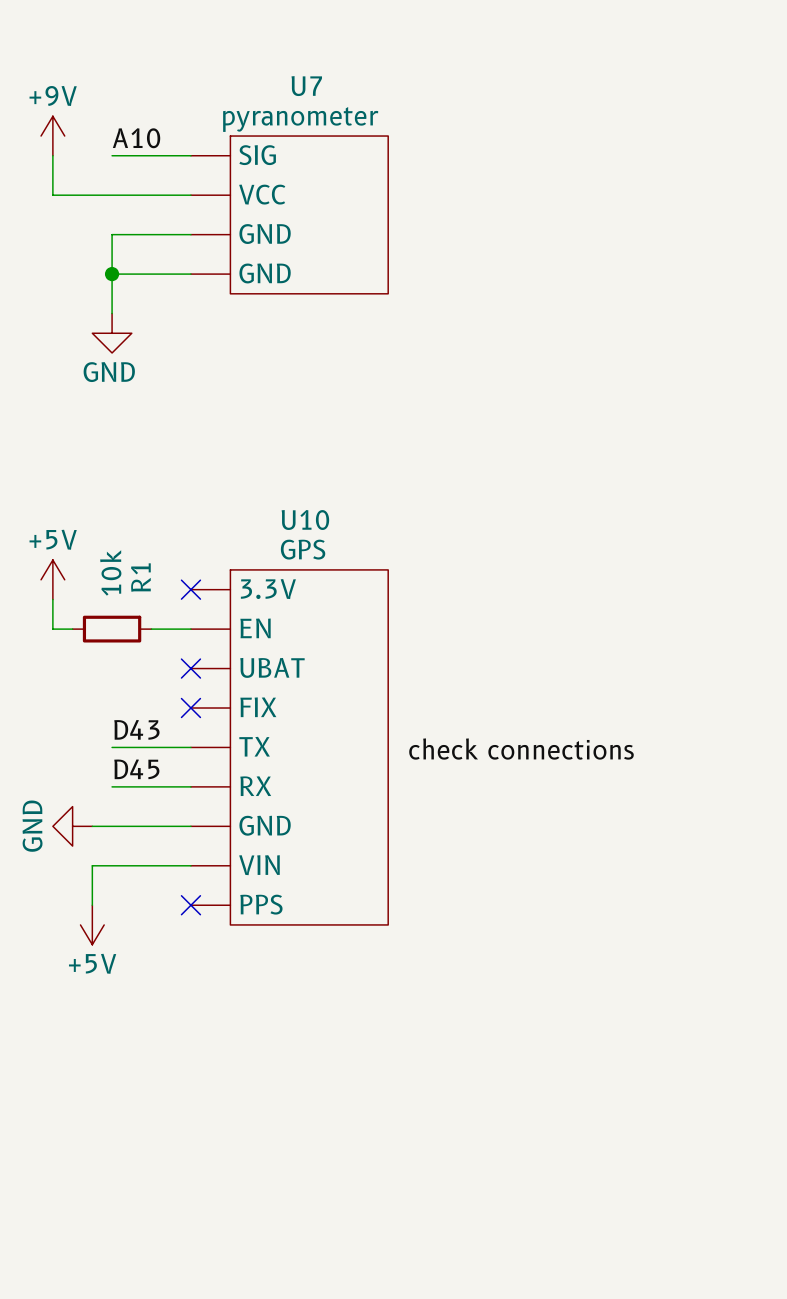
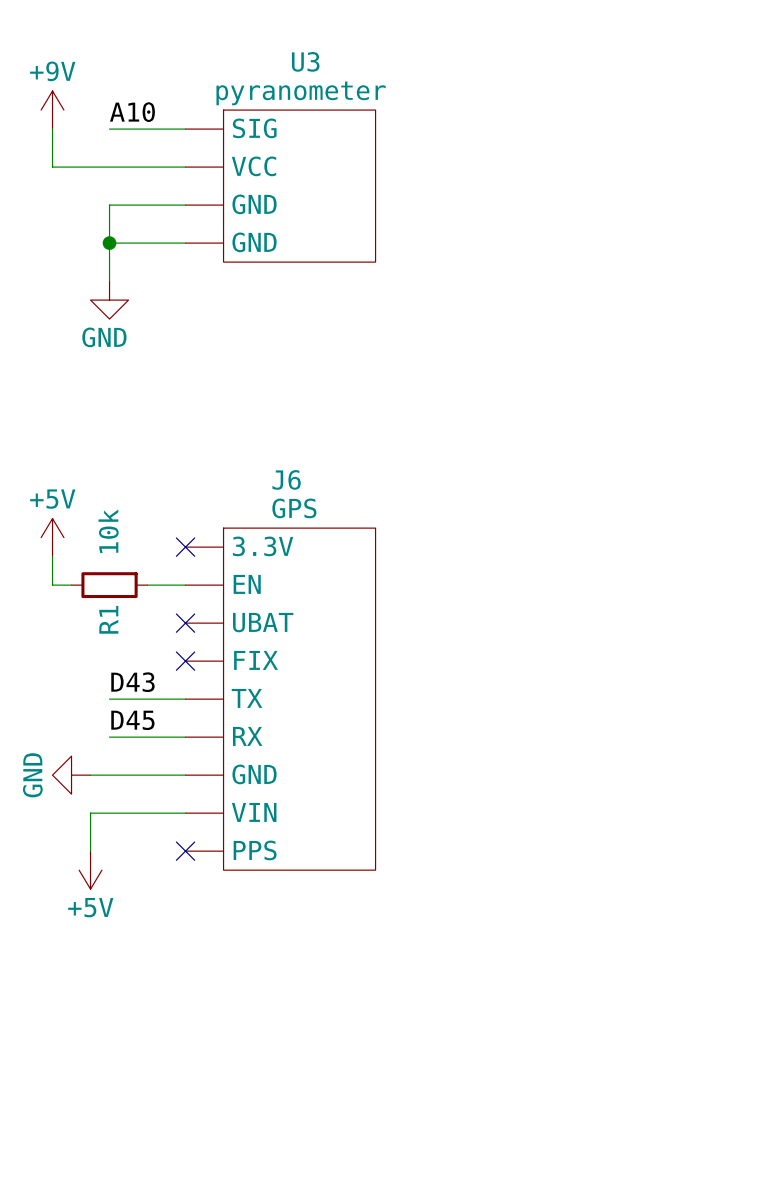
U7 name: U7 (306, 86) -> U3 (305, 61)
U10 name: U10 (305, 520) -> J6 (286, 479)
R1 name position: R1 (140, 577) -> R1 (108, 619)
label: check connections (521, 749) -> none

